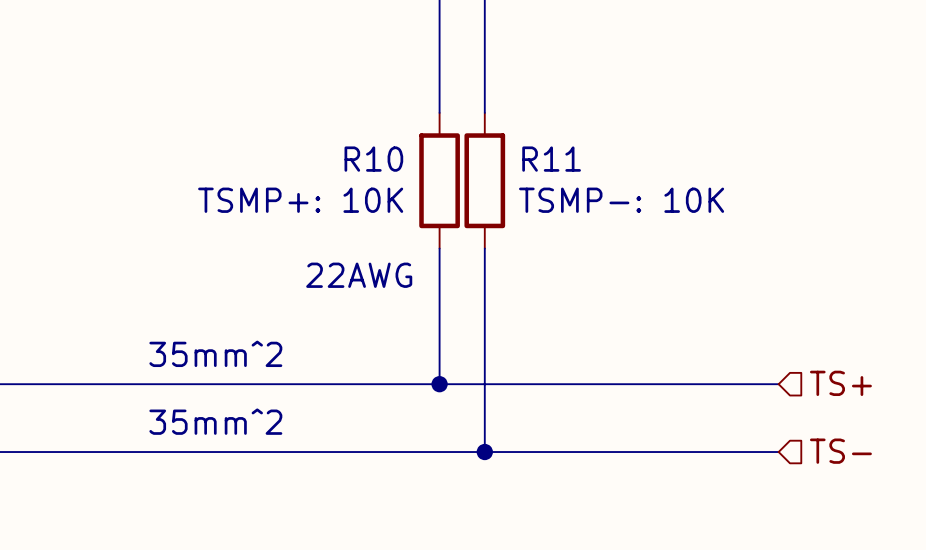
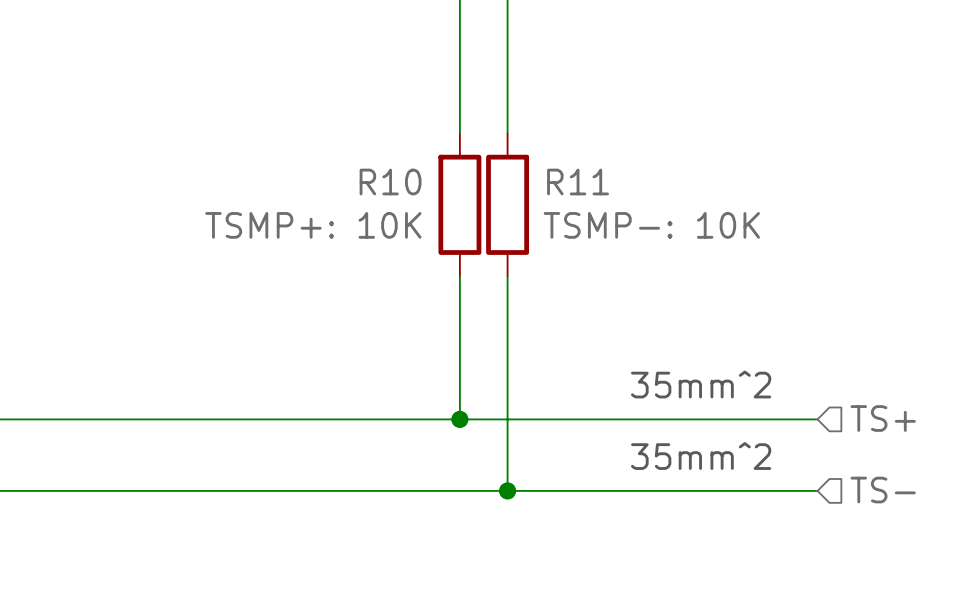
text: 22AWG (359, 275) -> none
text: none -> 35mm^2 (701, 384)
text: 35mm^2 (215, 353) -> none
text: none -> 35mm^2 (701, 456)
text: 35mm^2 (215, 421) -> none

